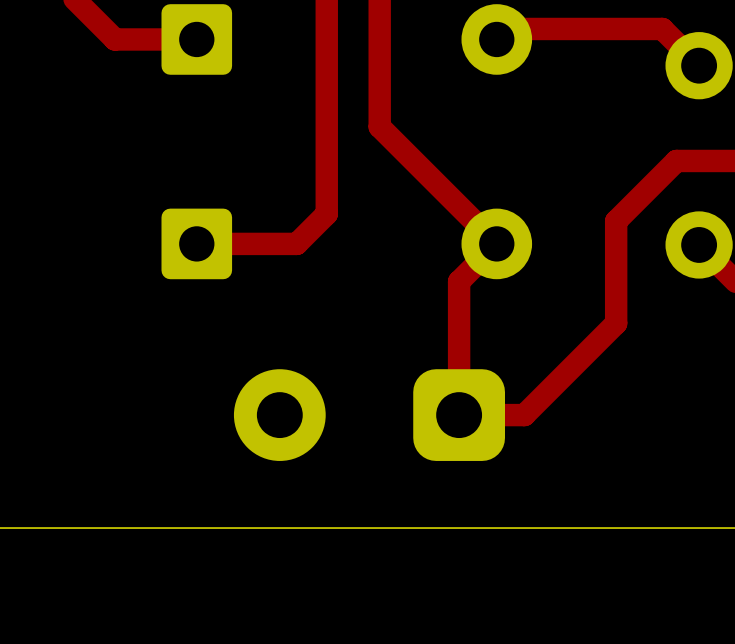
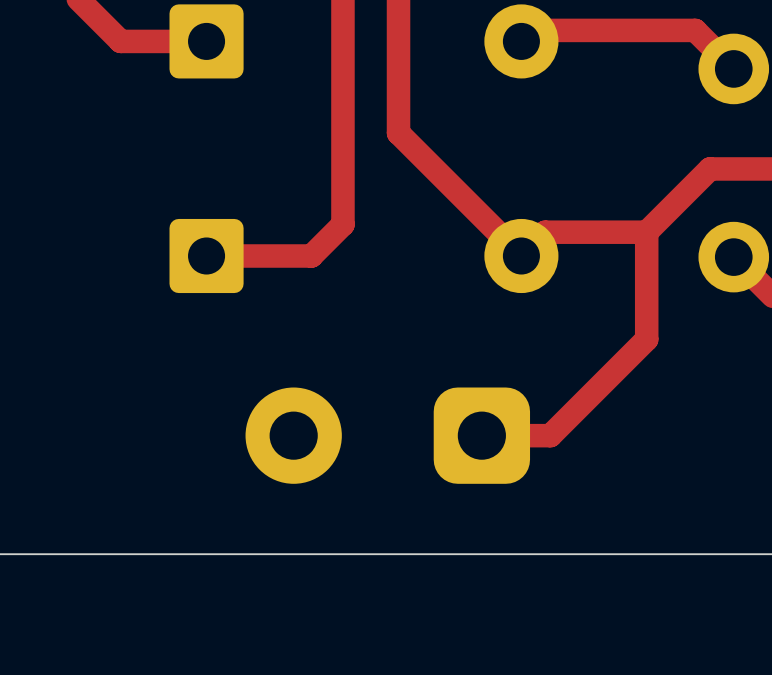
top track: (496, 243) (459, 281) (459, 415) -> (521, 256) (545, 232) (646, 232)

